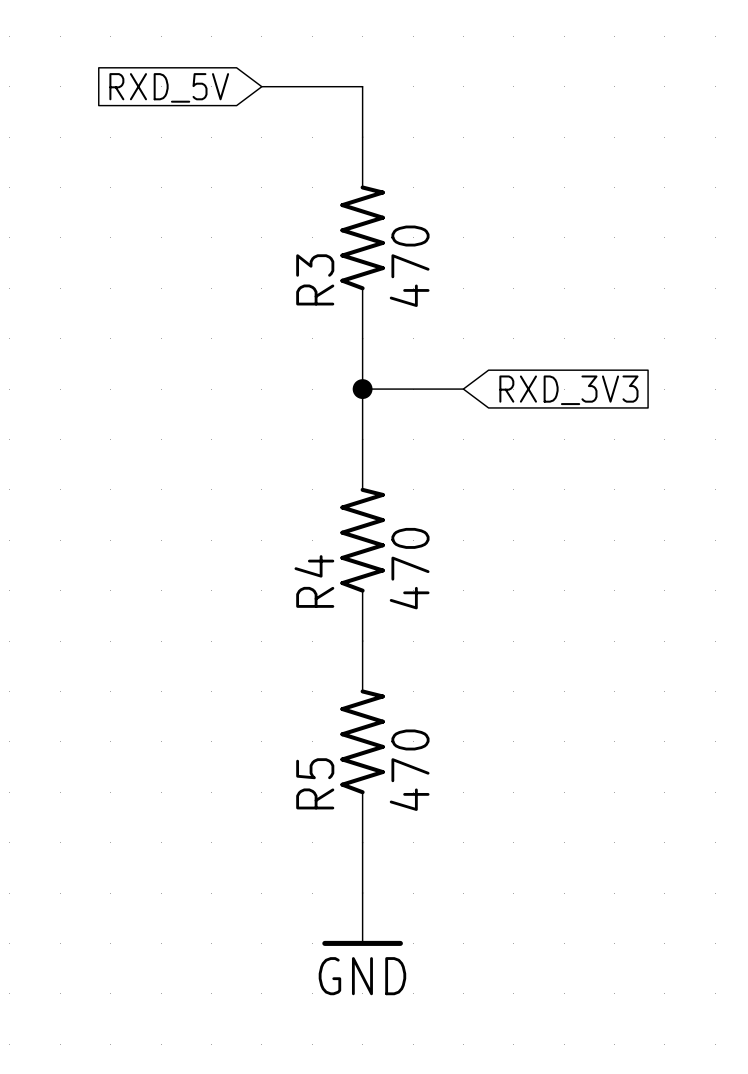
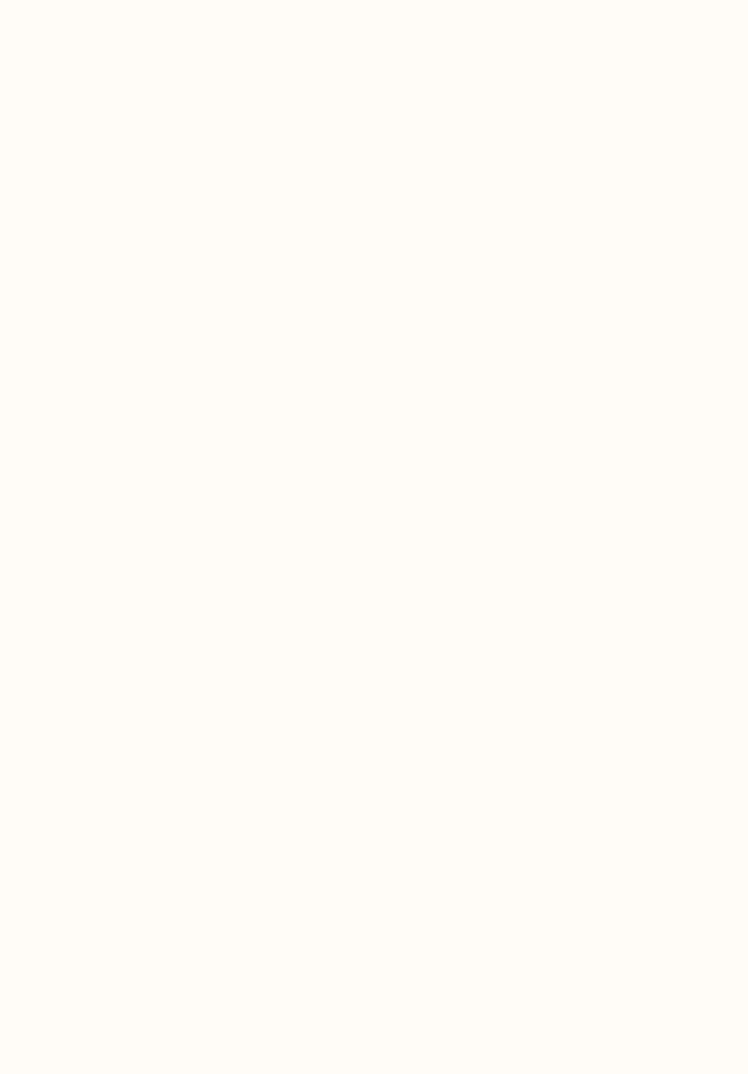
wire: (261, 86) (362, 86) (362, 137) -> none
global label: RXD_5V (169, 87) -> none
R3: 470 (362, 237) -> none
wire: (362, 338) (362, 439) -> none
wire: (362, 389) (463, 389) -> none
junction: (362, 389) -> none
global label: RXD_3V3 (568, 390) -> none
R4: 470 (362, 540) -> none
R5: 470 (362, 741) -> none
wire: (362, 842) (362, 893) -> none
power symbol: GND (362, 919) -> none

